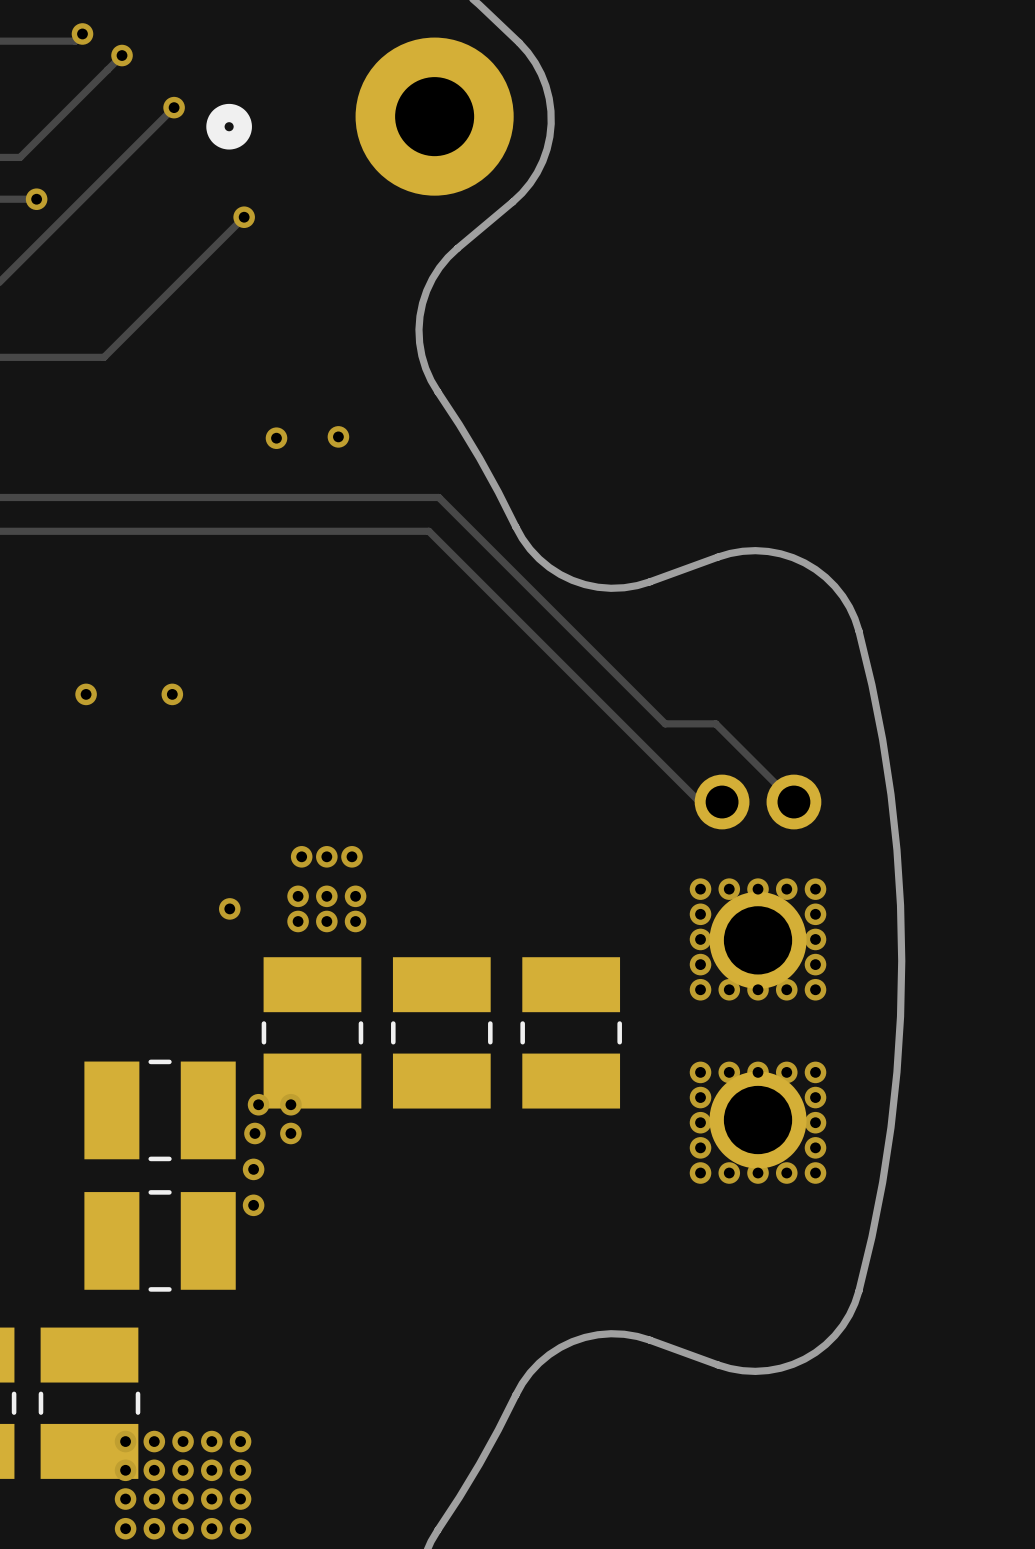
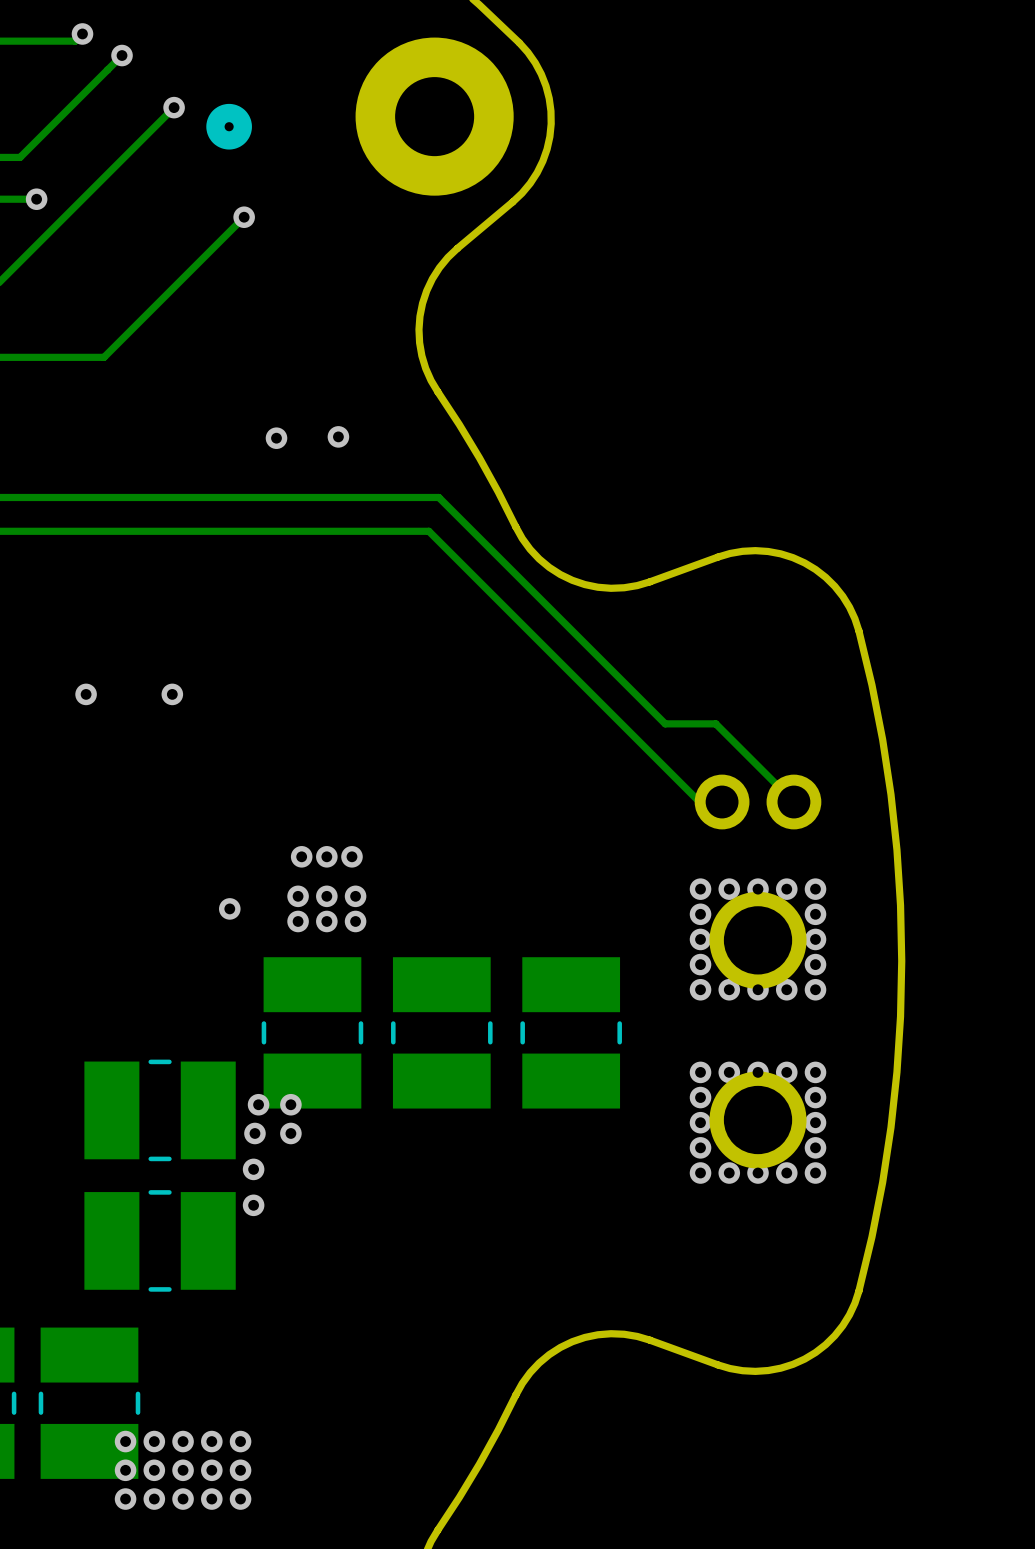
via: (125, 1528) -> none
via: (154, 1528) -> none
via: (183, 1528) -> none
via: (211, 1528) -> none
via: (240, 1528) -> none

